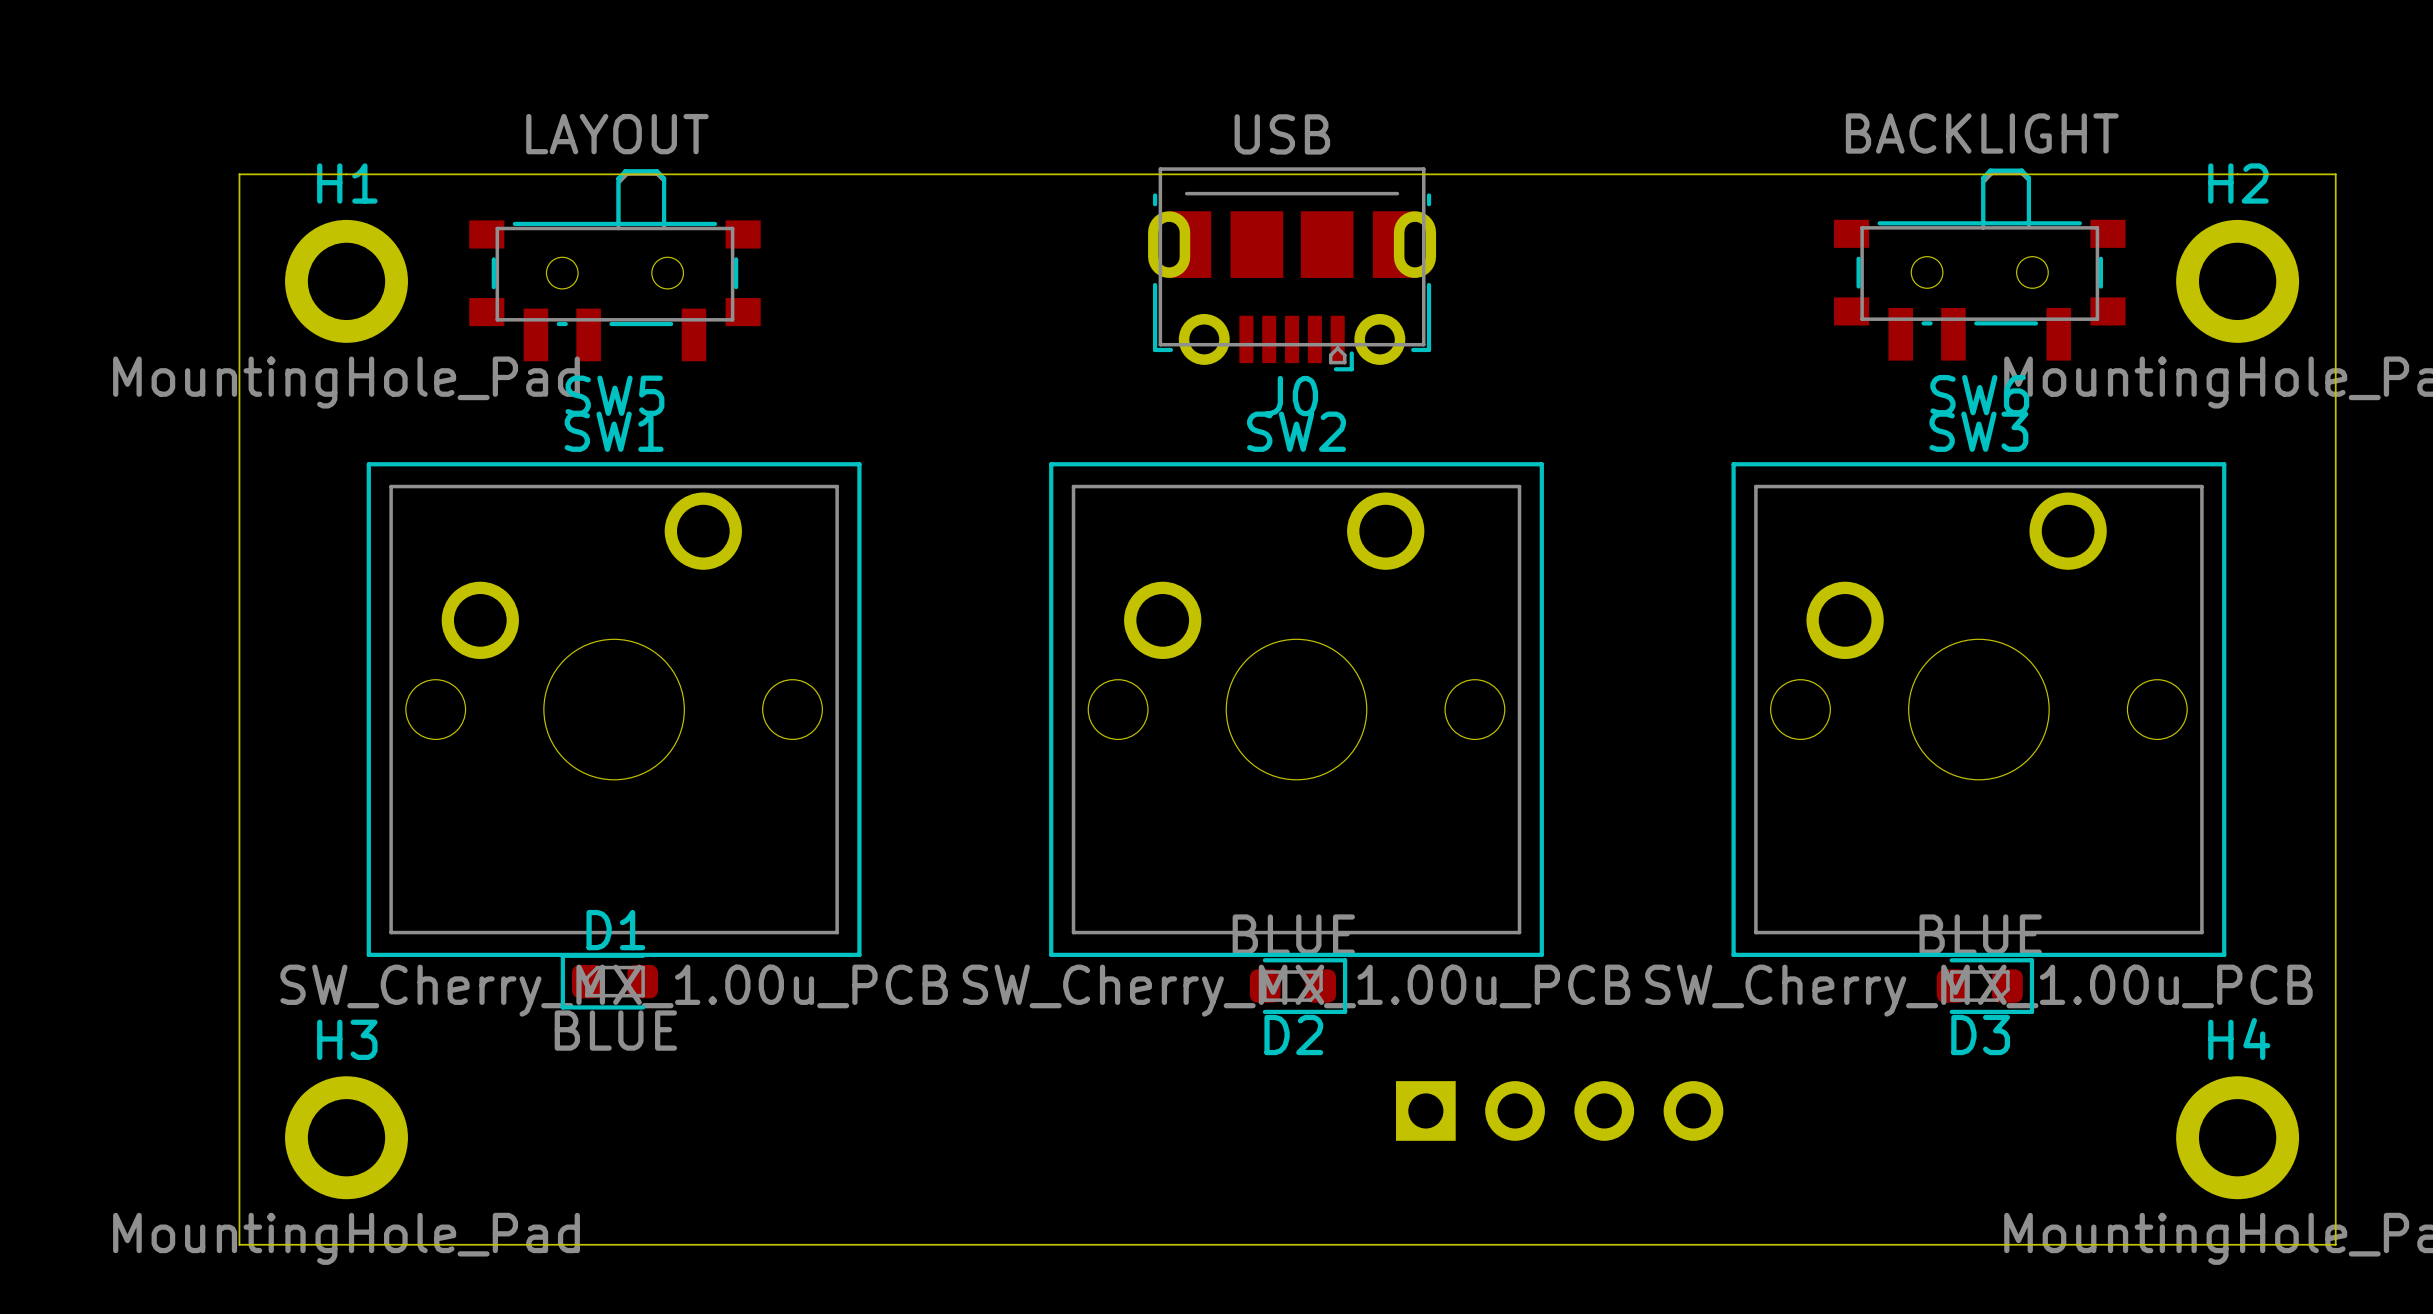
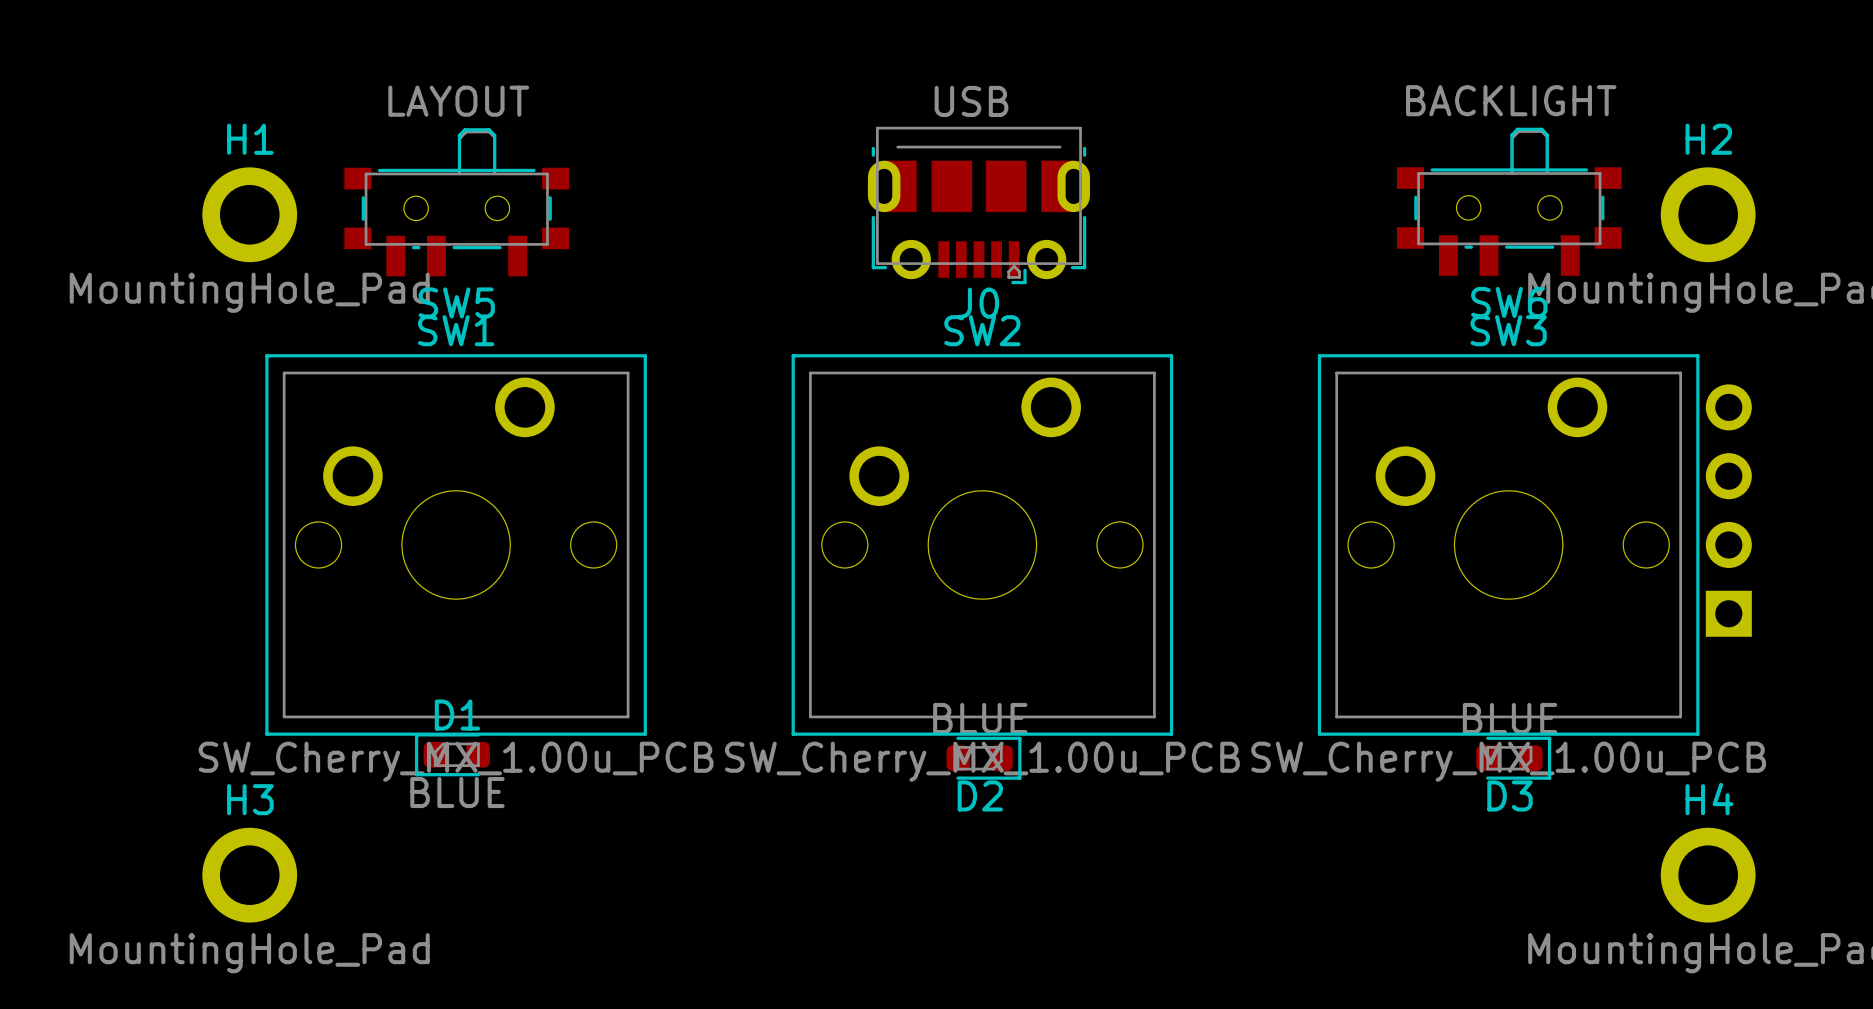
board edge: (239, 174) (2335, 174) (2335, 1244) (239, 1244) (239, 174) -> none
part rotation: 0° (1559, 1110) -> 90° counterclockwise (1728, 510)
part position: (1559, 1110) -> (1728, 510)

